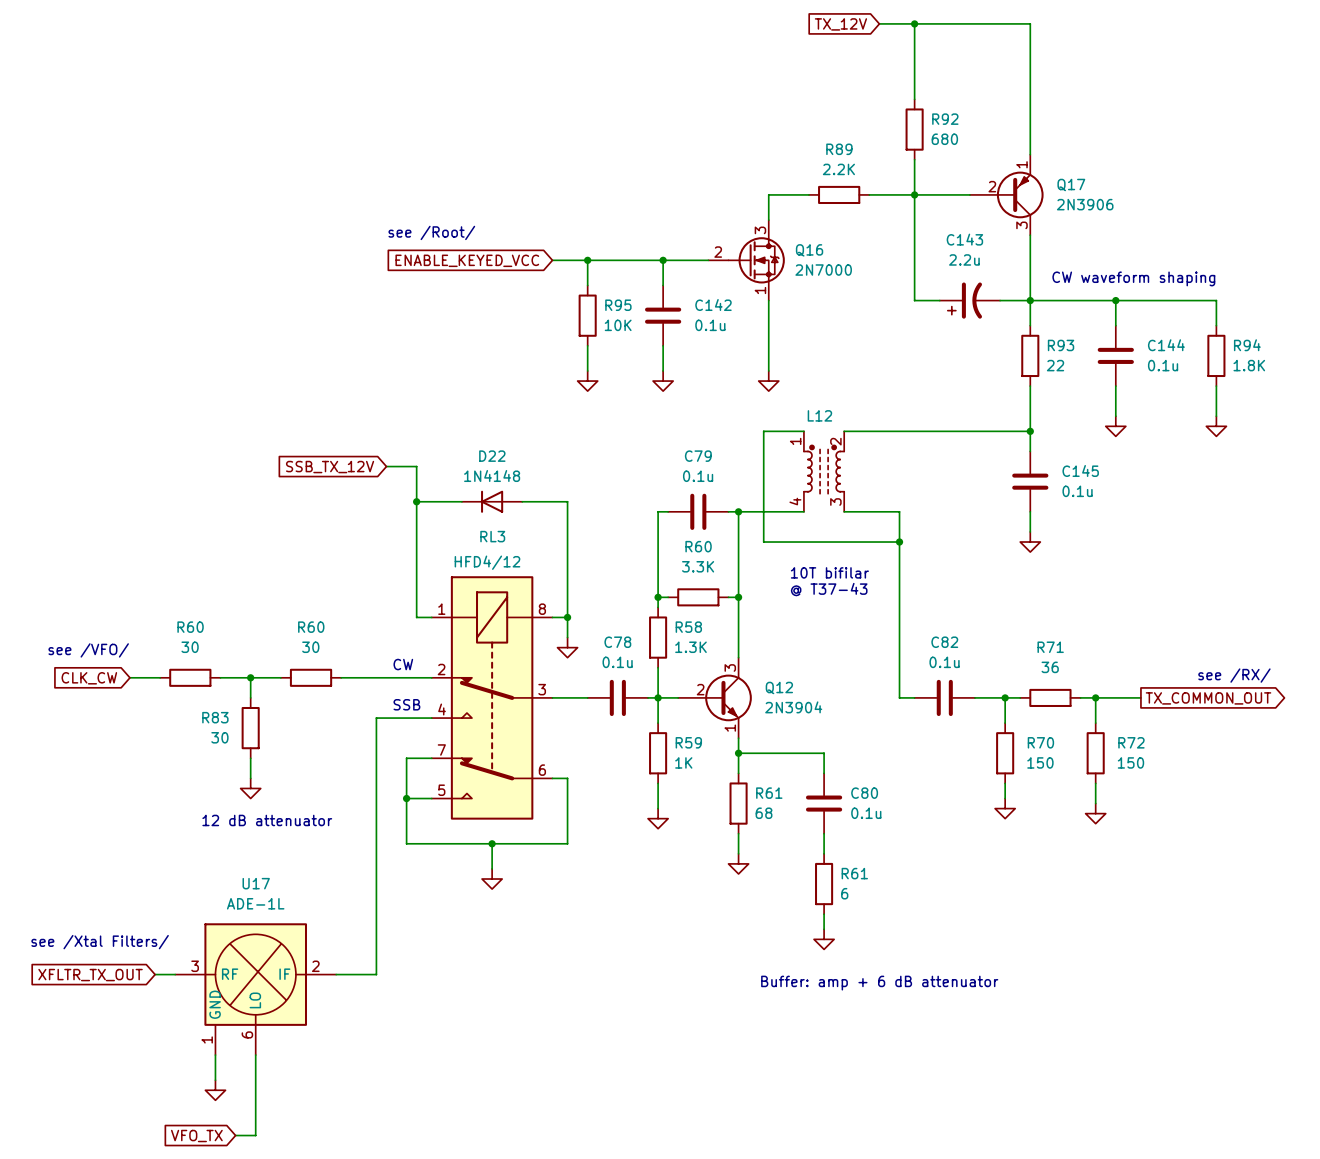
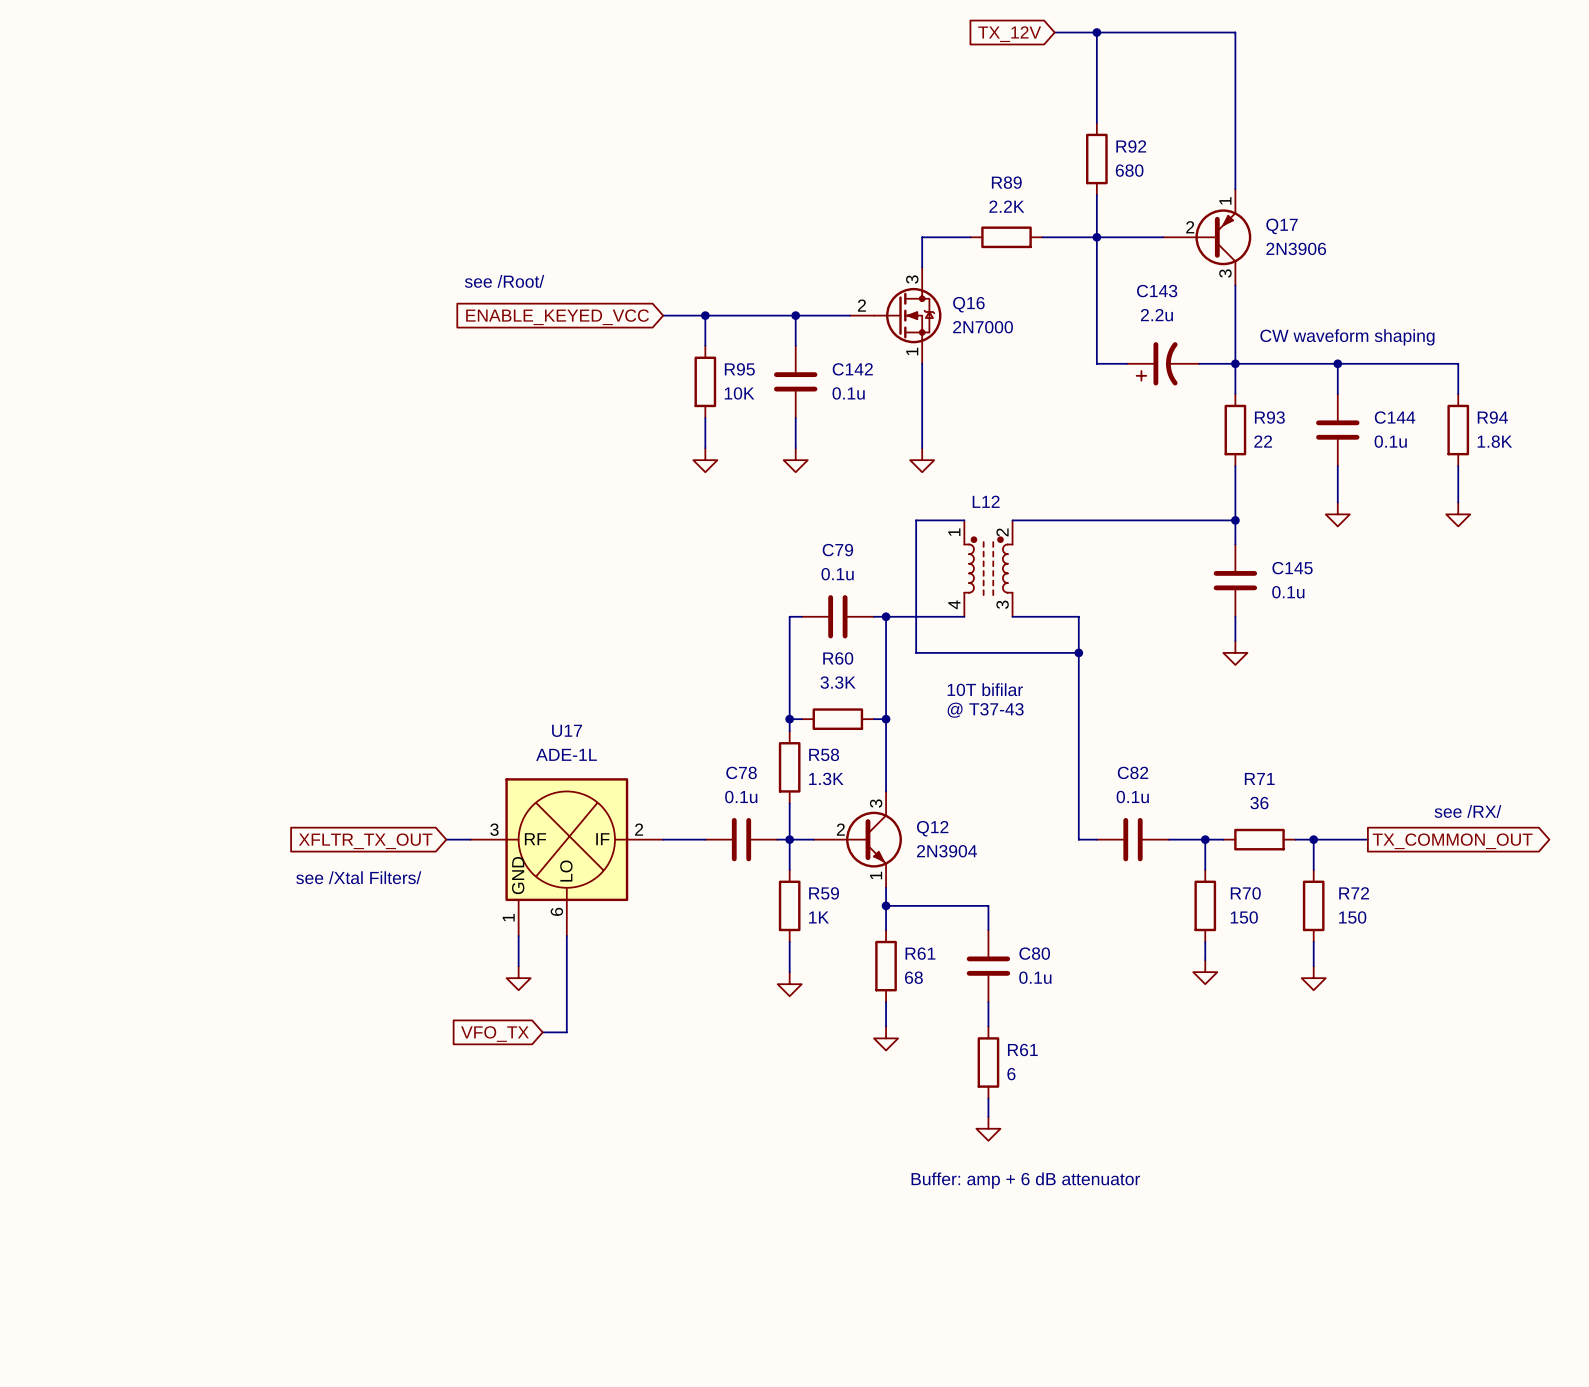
wire: (386, 466) (416, 466) (416, 617) (431, 617) -> none
global label: SSB_TX_12V (330, 467) -> none
wire: (416, 501) (461, 501) -> none
junction: (416, 501) -> none
D22: 1N4148 (492, 501) -> none
wire: (522, 501) (567, 501) (567, 637) -> none
wire: (552, 617) (567, 617) -> none
junction: (567, 617) -> none
power symbol: (567, 647) -> none
text: see /VFO/ (88, 650) -> none
text: CW (403, 664) -> none
wire: (129, 677) (160, 677) -> none
R60: 30 (190, 677) -> none
wire: (220, 677) (280, 677) -> none
wire: (250, 677) (250, 697) -> none
junction: (250, 677) -> none
R60: 30 (311, 677) -> none
wire: (341, 677) (431, 677) -> none
global label: CLK_CW (89, 678) -> none
wire: none -> (446, 839) (470, 839)
RL3: HFD4/12 (492, 697) -> none
global label: none -> XFLTR_TX_OUT (365, 841)
text: SSB (406, 704) -> none
wire: (431, 718) (376, 718) (376, 974) (336, 974) -> none
R83: 30 (250, 728) -> none
text: none -> see /Xtal Filters/ (358, 877)
wire: (250, 758) (250, 778) -> none
wire: (431, 758) (406, 758) (406, 843) (567, 843) (567, 778) (552, 778) -> none
wire: none -> (566, 936) (566, 1032) (542, 1032)
power symbol: (250, 788) -> none
wire: (406, 798) (431, 798) -> none
junction: (406, 798) -> none
text: 12 dB attenuator (267, 820) -> none
wire: (492, 843) (492, 868) -> (518, 936) (518, 966)
junction: (492, 843) -> none
global label: none -> VFO_TX (494, 1034)
power symbol position: (492, 879) -> (518, 978)
text: see /Xtal Filters/ (100, 942) -> none
wire: (155, 974) (175, 974) -> none
global label: XFLTR_TX_OUT (90, 975) -> none
U17 position: (255, 989) -> (566, 857)
wire: (215, 1055) (215, 1080) -> none
wire: (255, 1055) (255, 1135) (235, 1135) -> none
power symbol: (215, 1090) -> none
global label: VFO_TX (196, 1136) -> none

